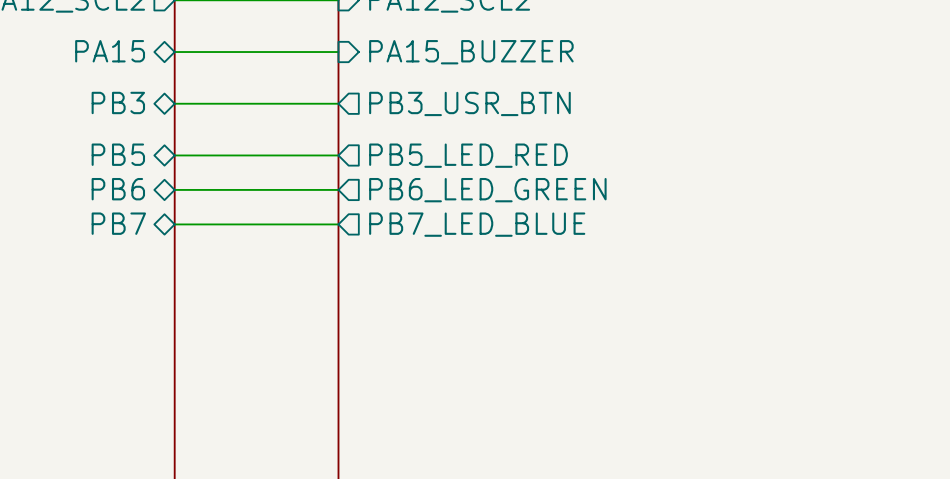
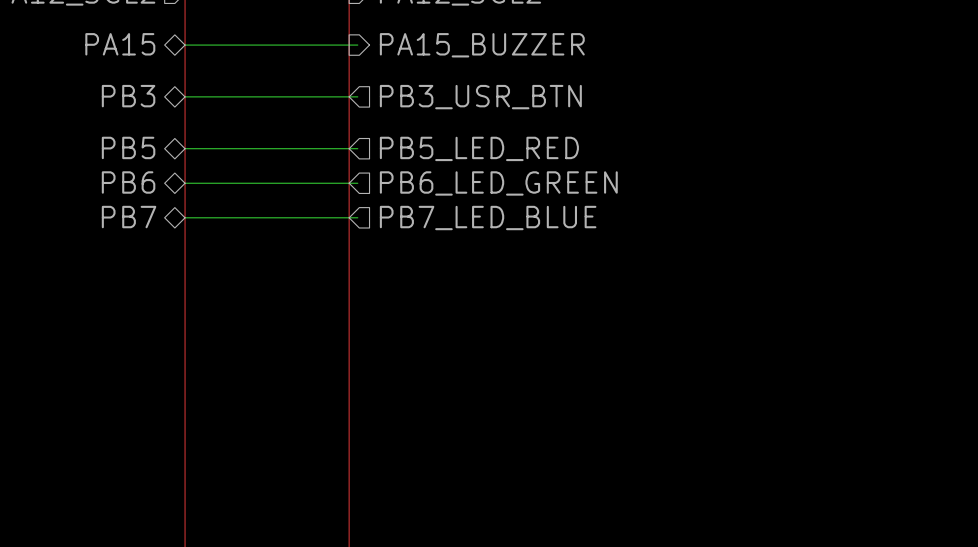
wire: none -> (349, 45) (357, 45)
wire: none -> (349, 96) (357, 96)
wire: none -> (349, 148) (357, 148)
wire: none -> (349, 183) (357, 183)
wire: none -> (349, 217) (357, 217)

